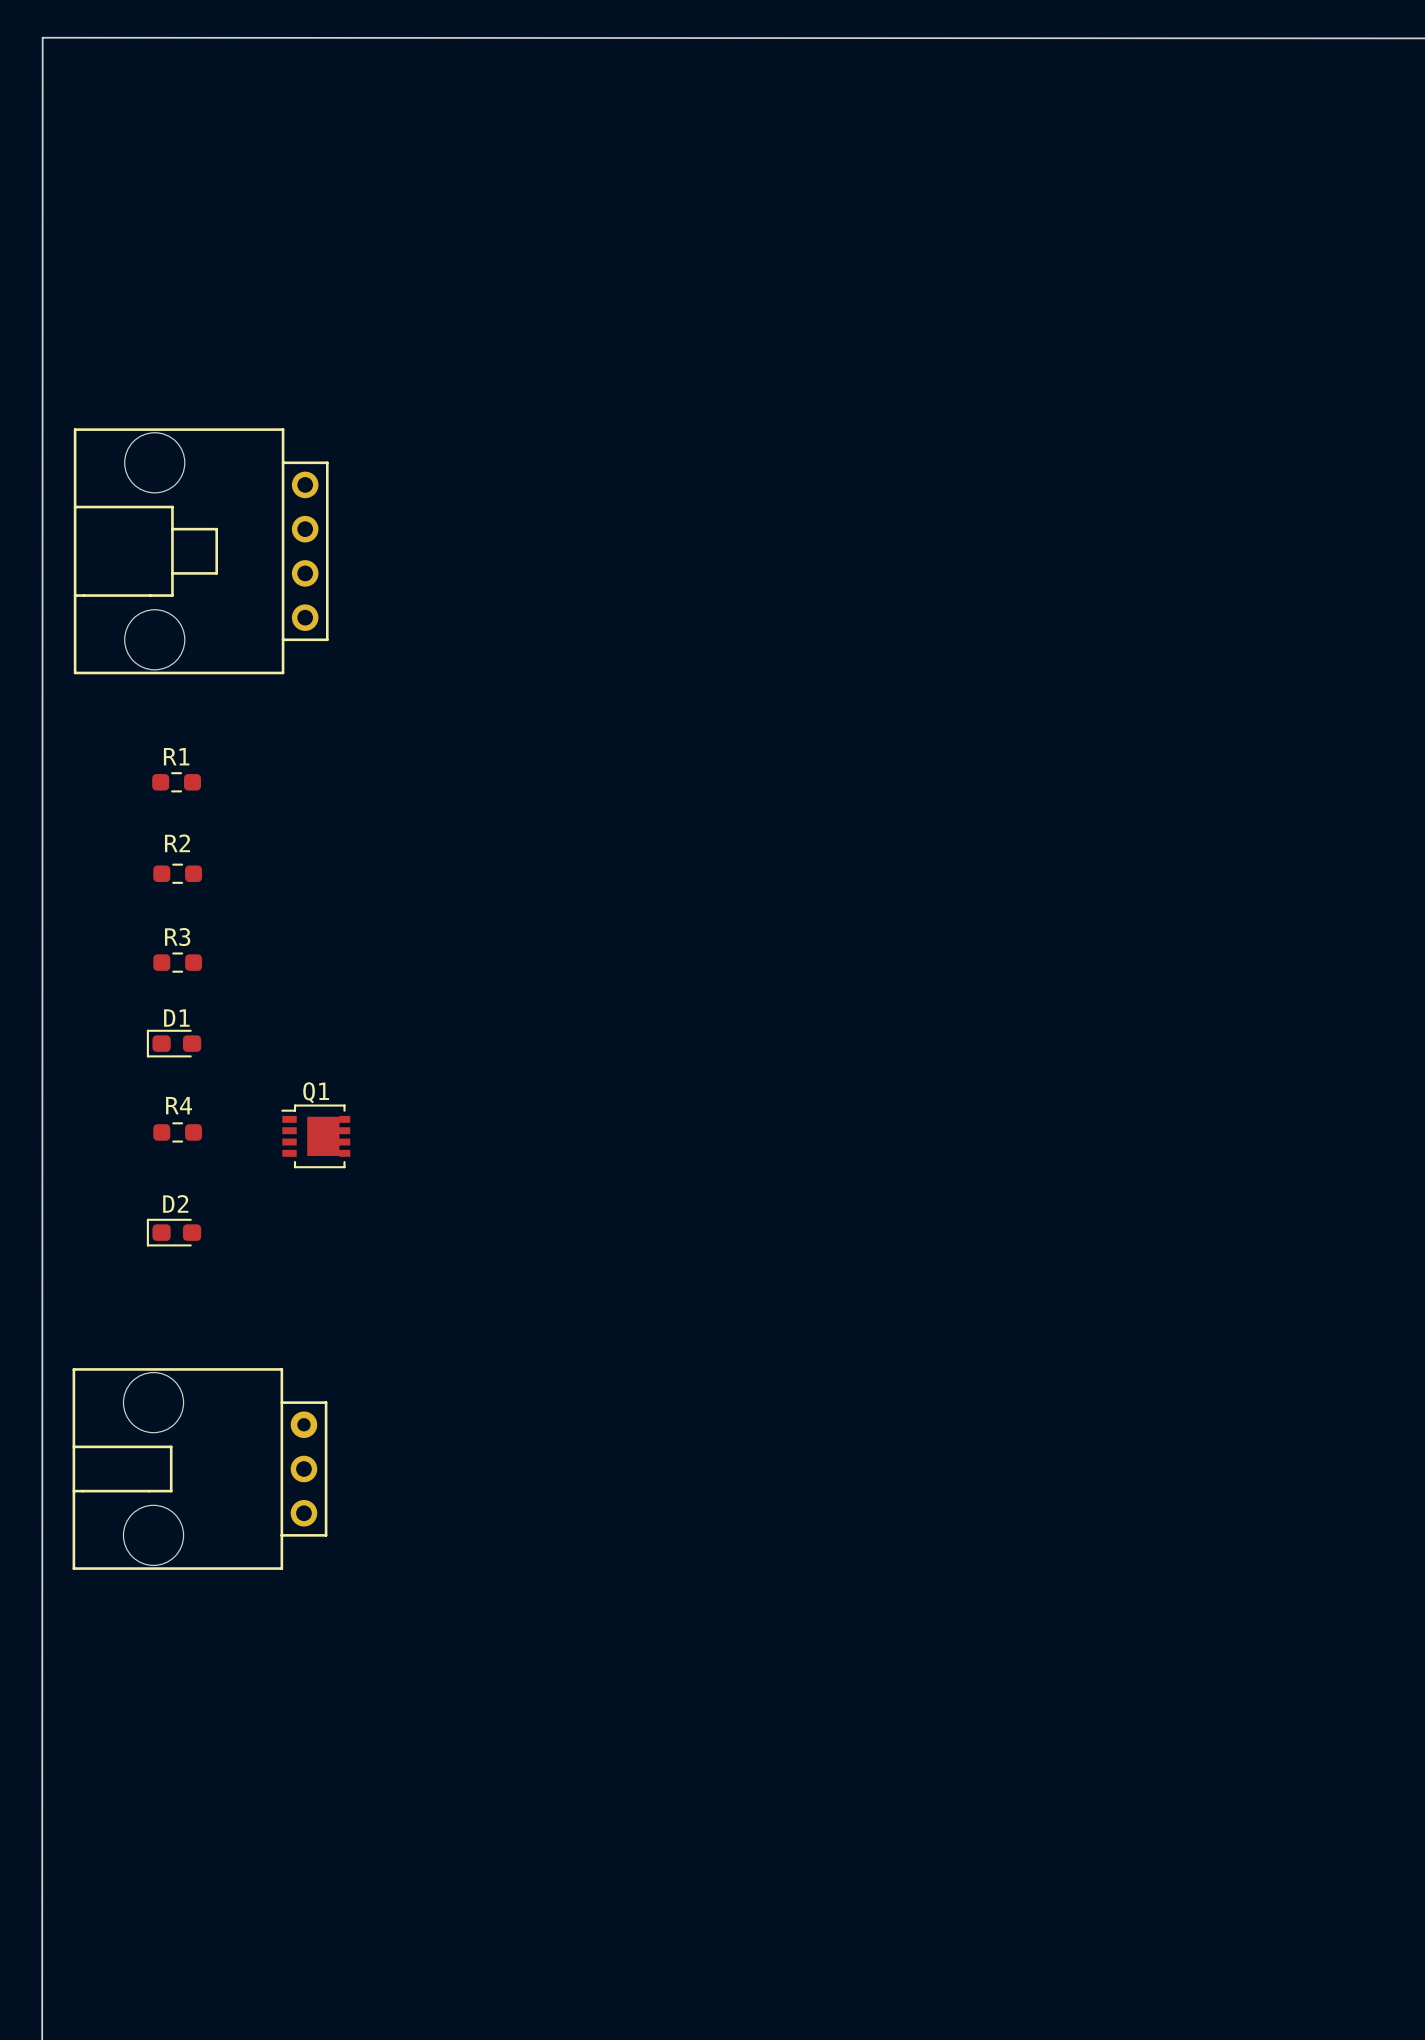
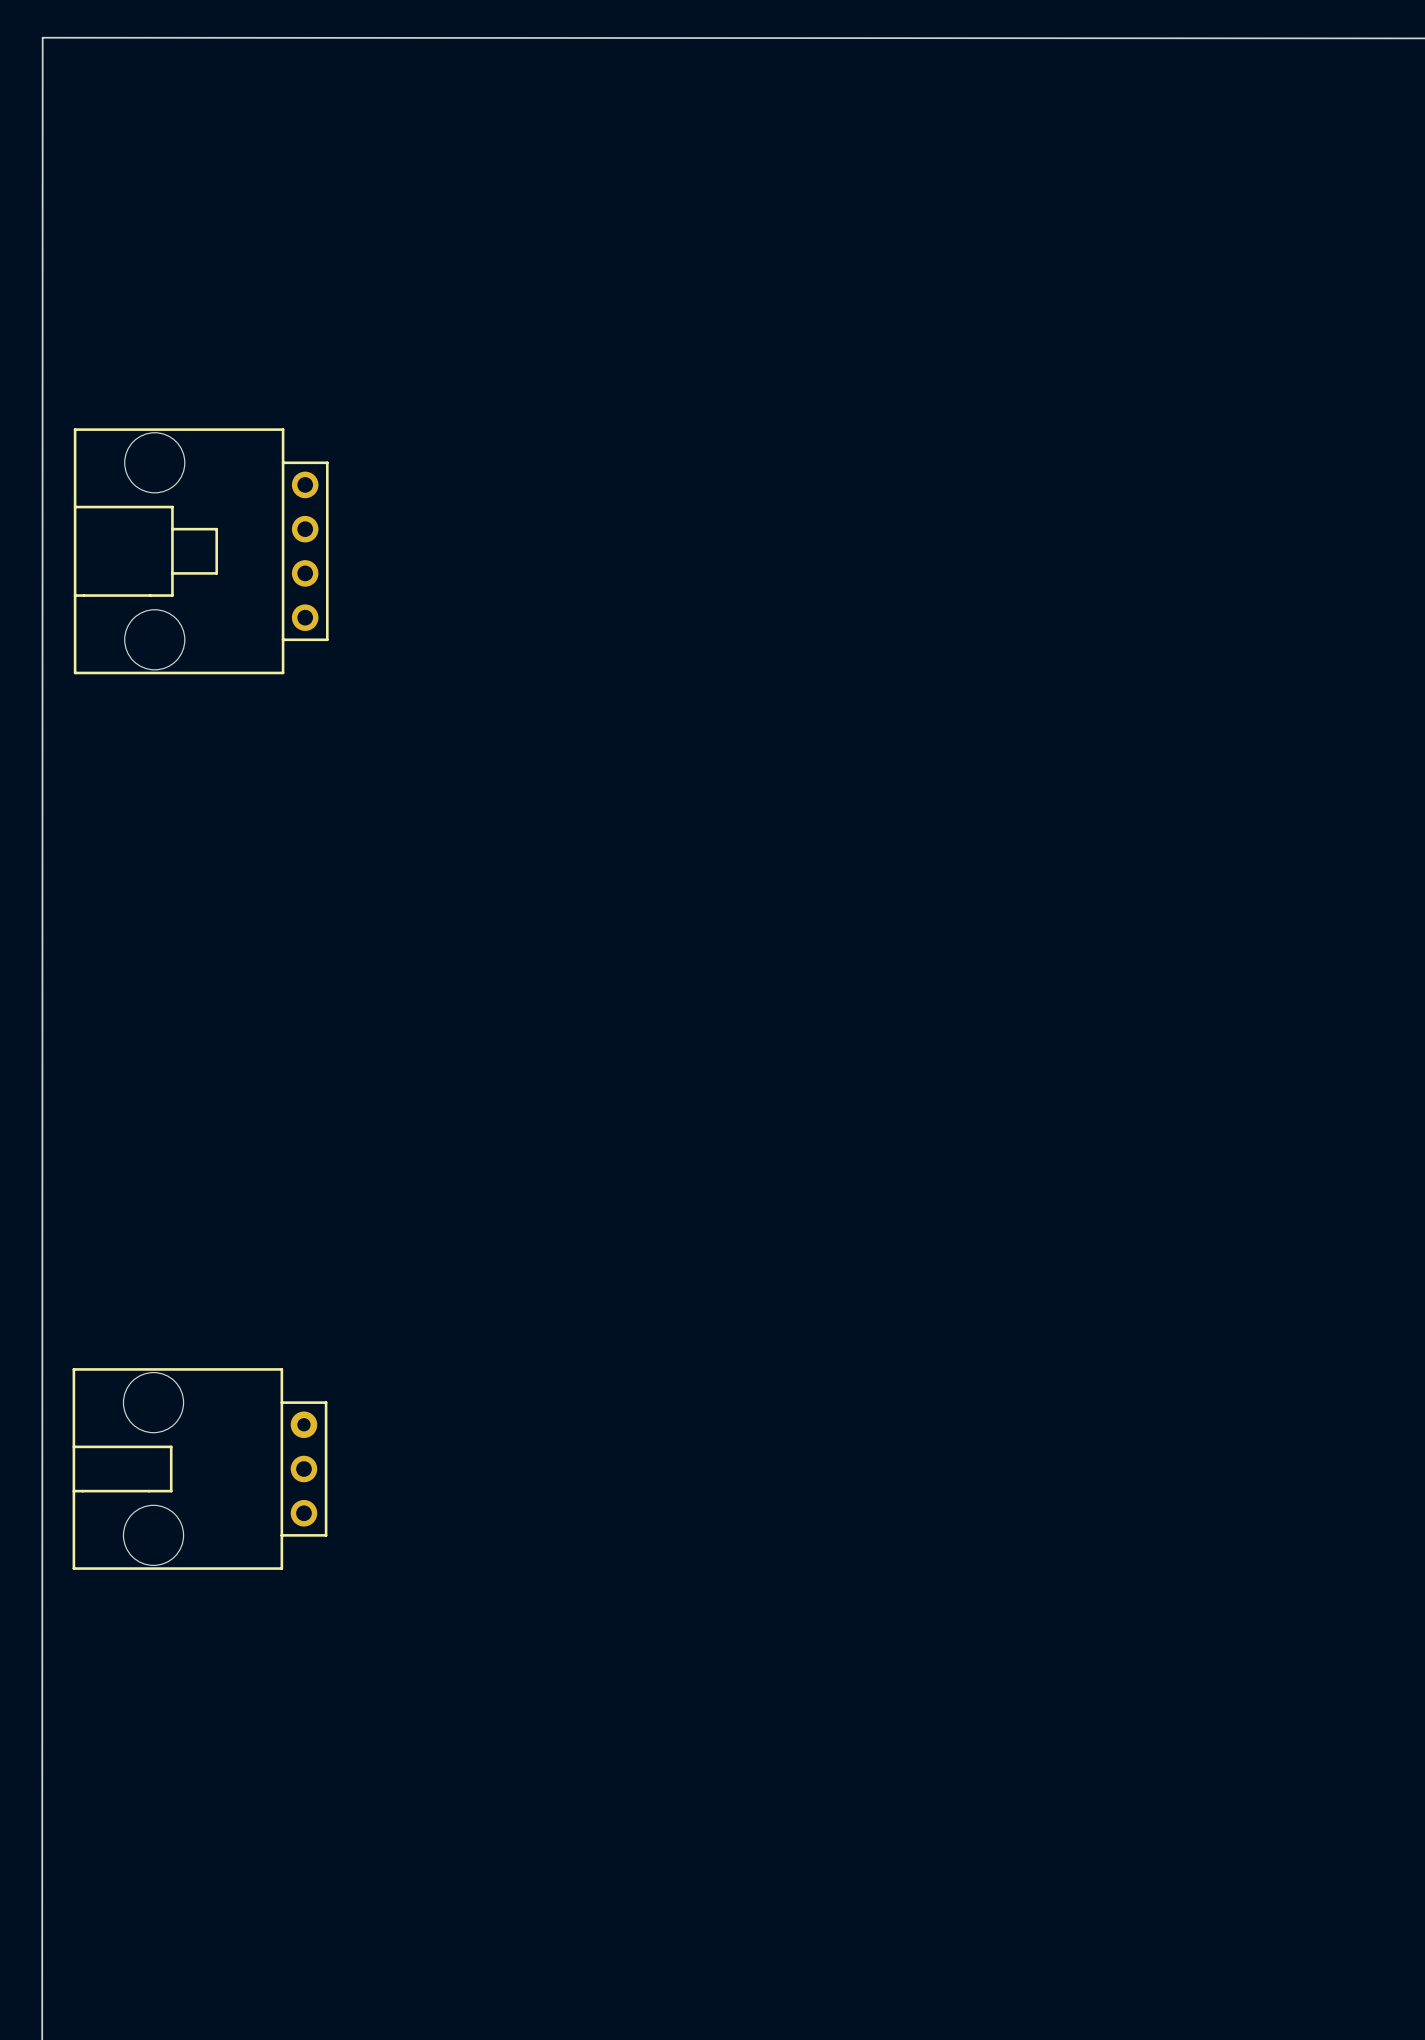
R1: (176, 782) -> none
R2: (177, 873) -> none
R3: (177, 962) -> none
D1: (174, 1043) -> none
R4: (177, 1132) -> none
Q1: (315, 1136) -> none
D2: (174, 1232) -> none

